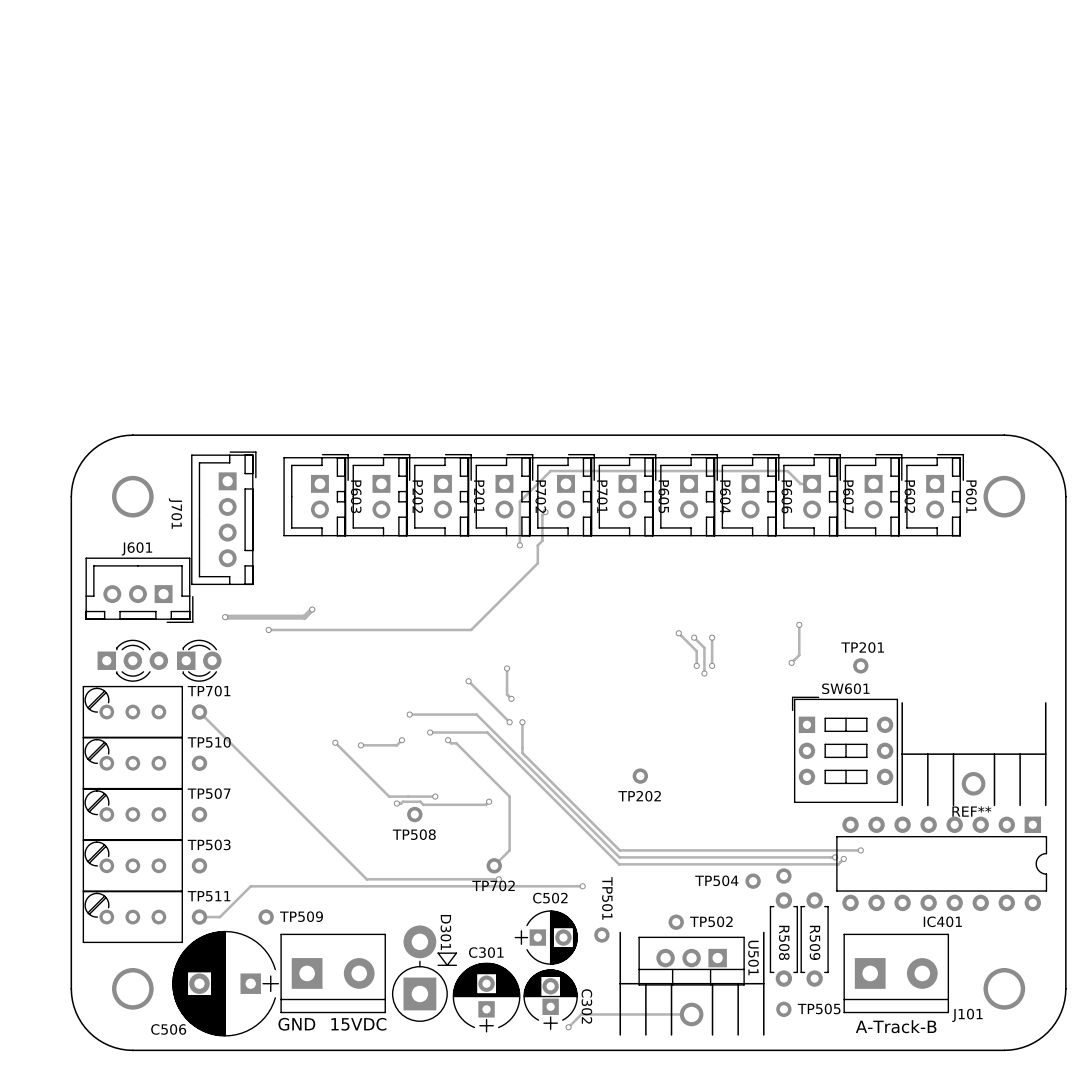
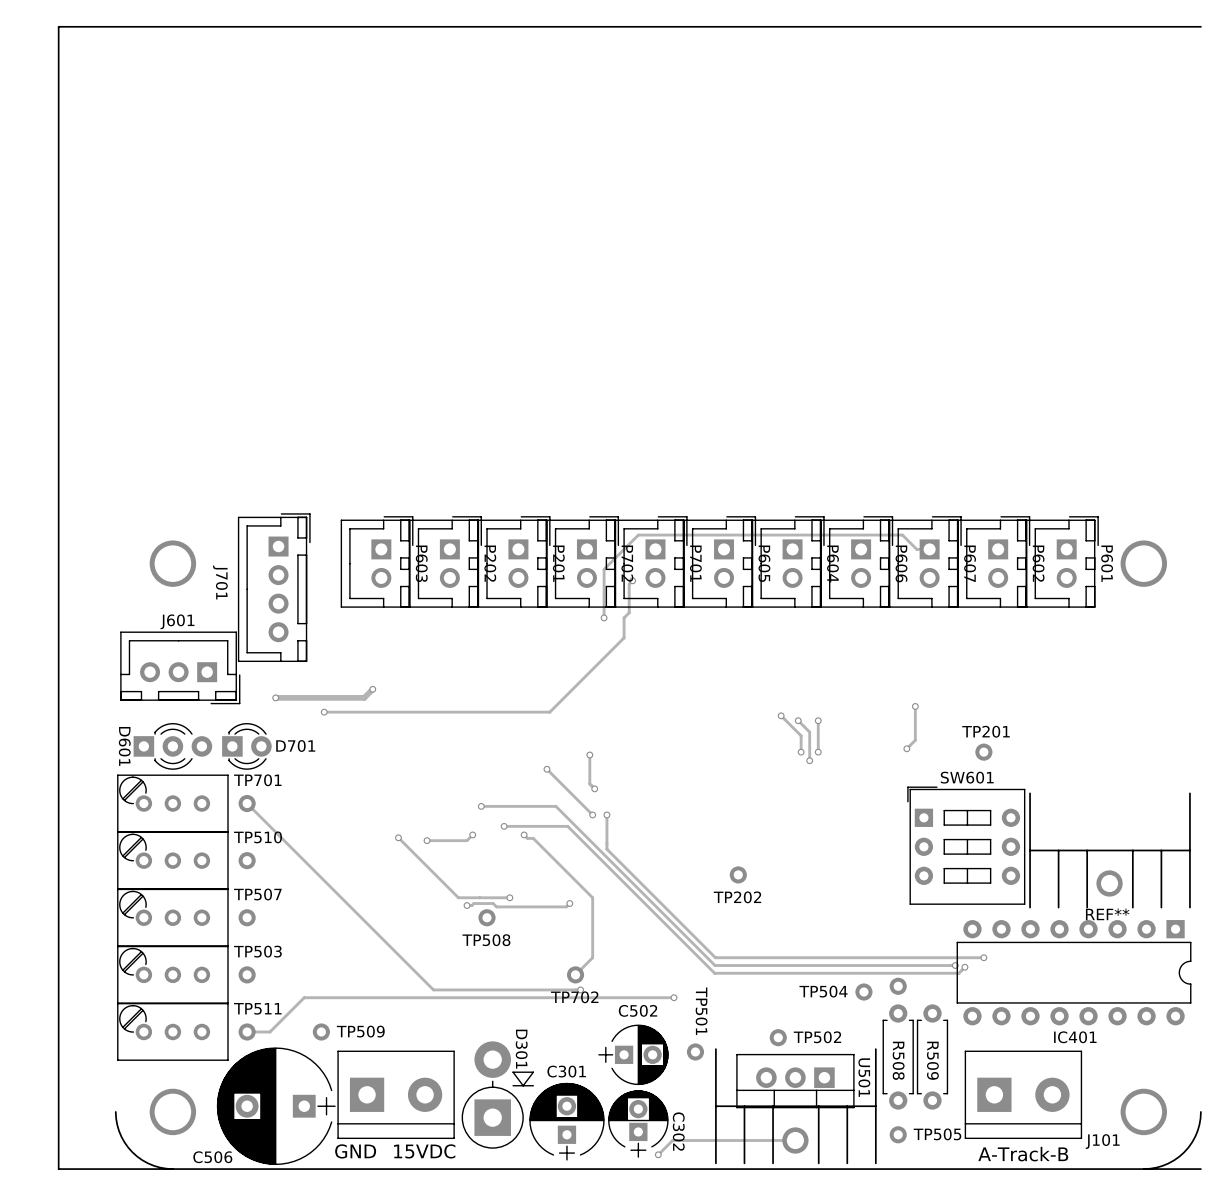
board edge: none -> (1200, 26) (58, 26) (58, 1169) (1200, 1169)
board edge: (1004, 435) (132, 435) (114, 437) (98, 445) (85, 457) (78, 467) (72, 484) (71, 496) (71, 988) (73, 1006) (81, 1023) (93, 1036) (103, 1043) (120, 1049) (132, 1050) (1004, 1050) (1022, 1047) (1038, 1039) (1051, 1027) (1058, 1017) (1065, 994) (1065, 490) (1058, 467) (1043, 449) (1027, 439) (1004, 435) -> none
D601 name: none -> D601 (124, 746)
D701 name: none -> D701 (295, 746)
board edge: none -> (115, 1111) (118, 1130) (132, 1152) (154, 1165) (172, 1169)
board edge: none -> (1200, 1111) (1197, 1130) (1184, 1152) (1162, 1165) (1143, 1169)

